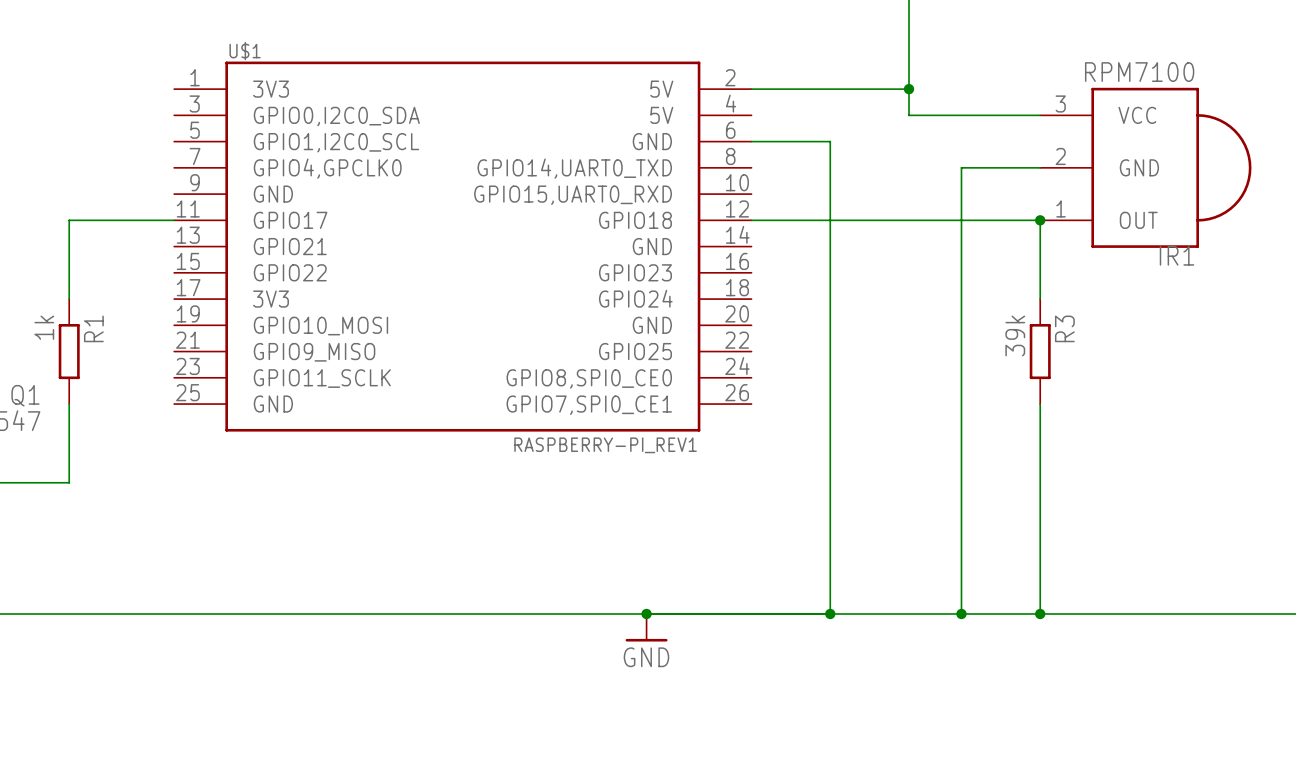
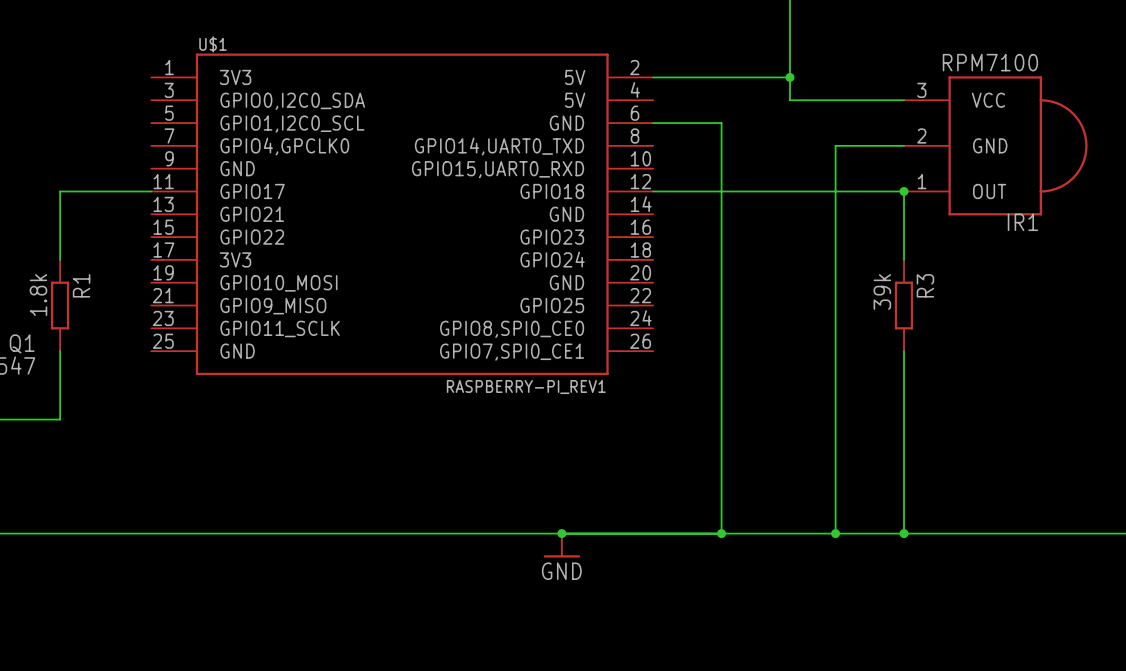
R1 value: 1k (44, 327) -> 1.8k (38, 295)

